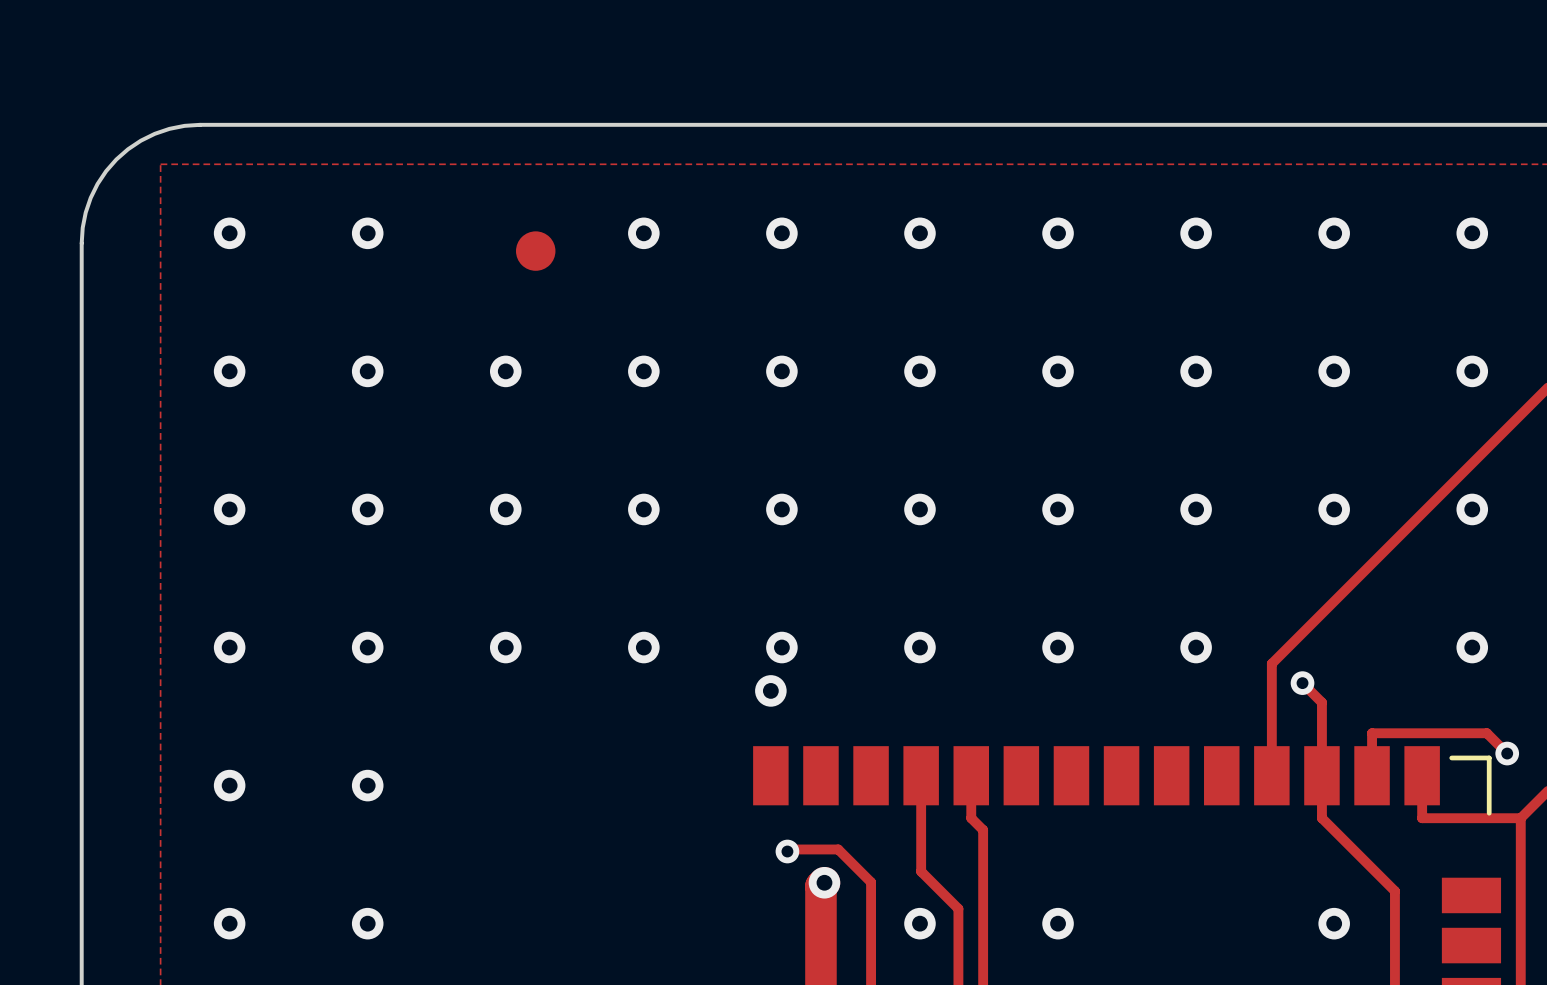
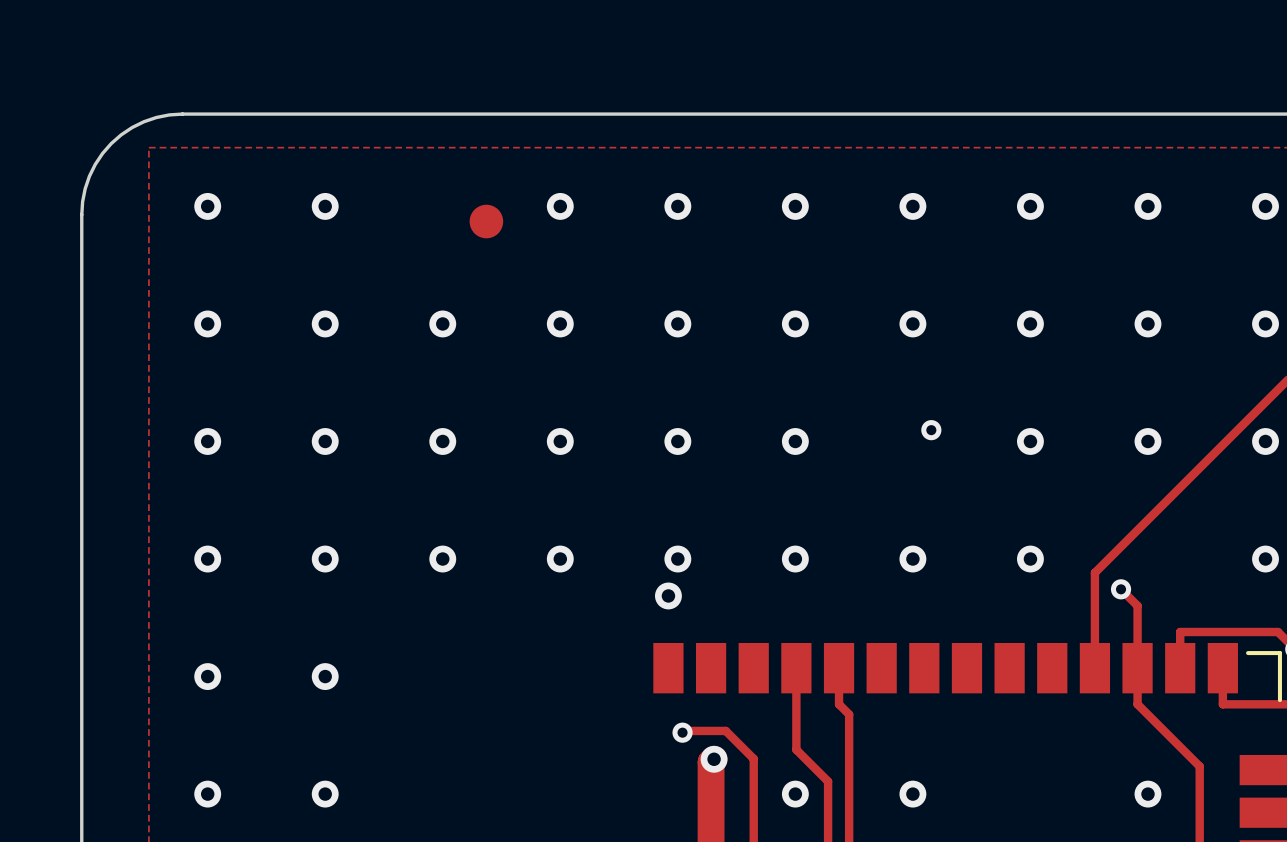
part position: (535, 251) -> (486, 221)
via position: (1058, 509) -> (931, 430)

